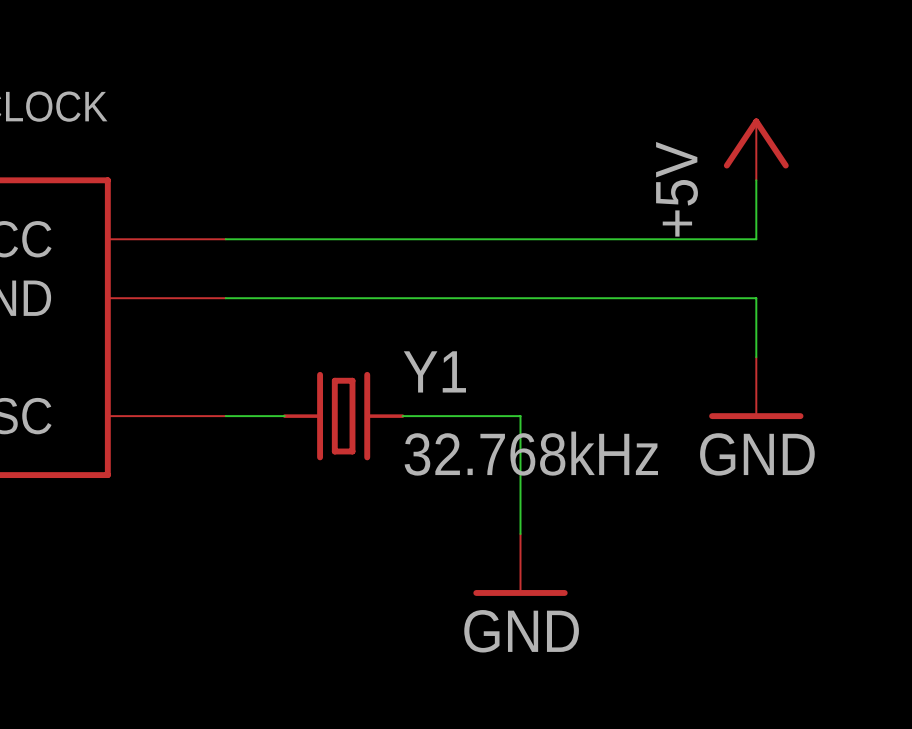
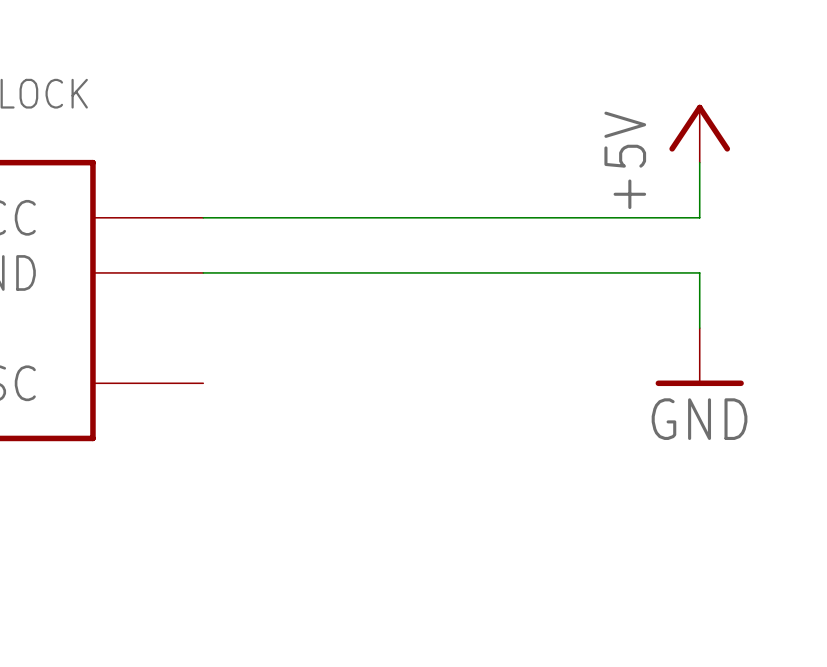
wire: (225, 416) (284, 416) -> none
Y1: 32.768kHz (343, 416) -> none
wire: (402, 416) (520, 416) (520, 534) -> none
power symbol: GND (520, 564) -> none

